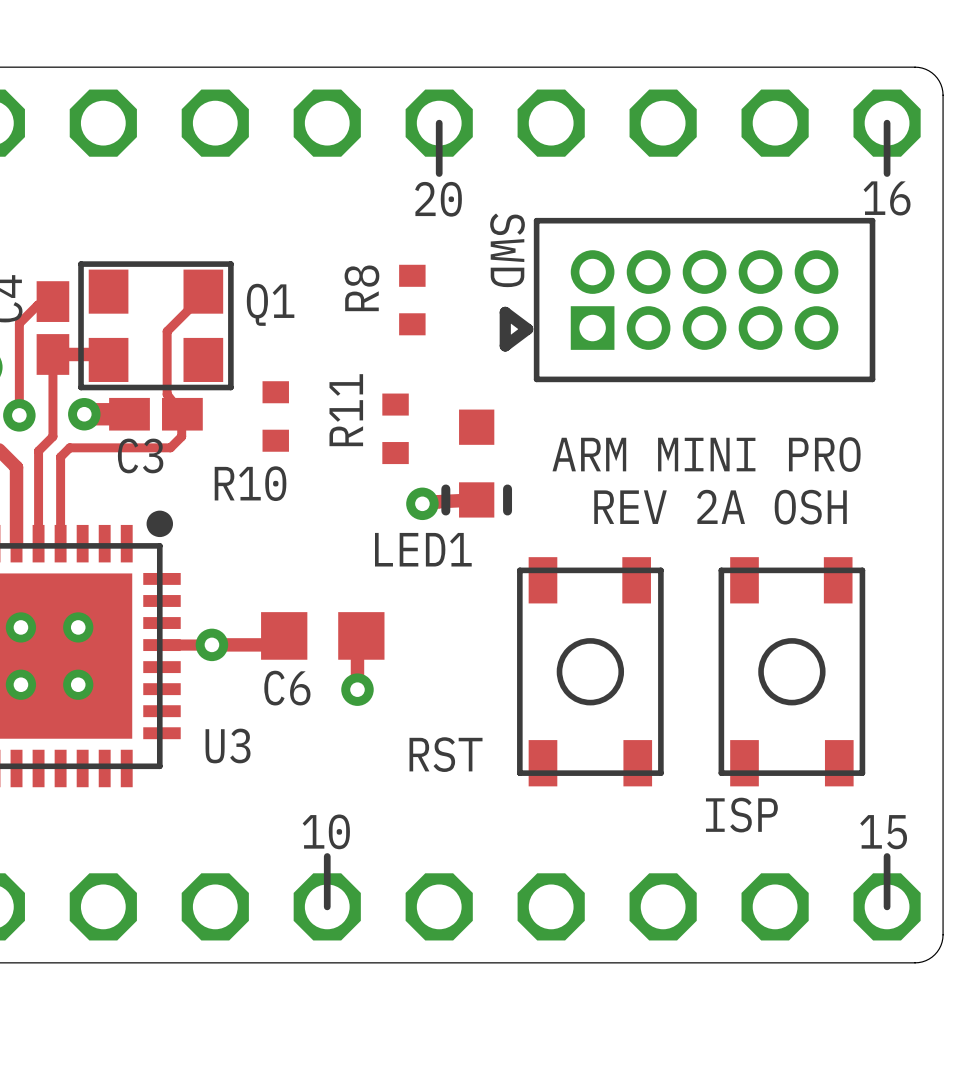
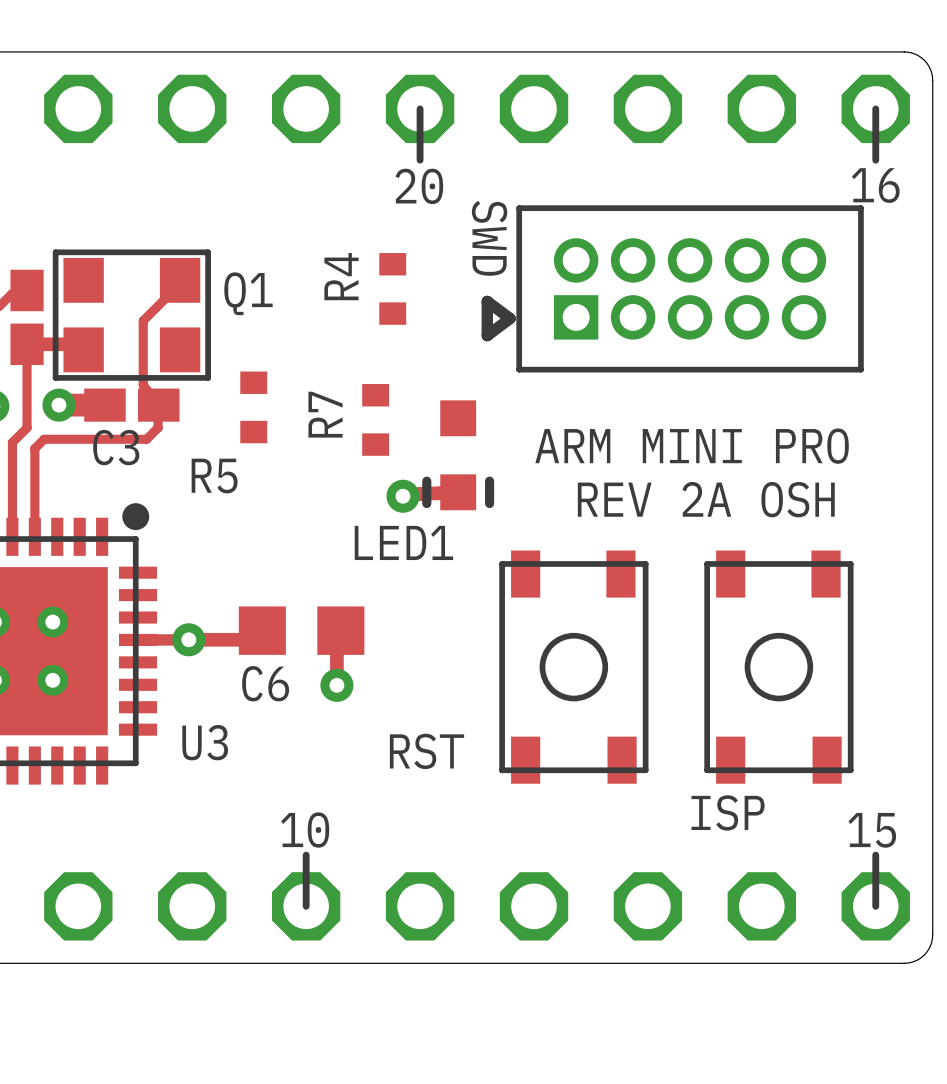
R8 name: R8 (361, 288) -> R4 (341, 276)
R11 name: R11 (346, 410) -> R7 (325, 414)
R10 name: R10 (250, 483) -> R5 (214, 476)

